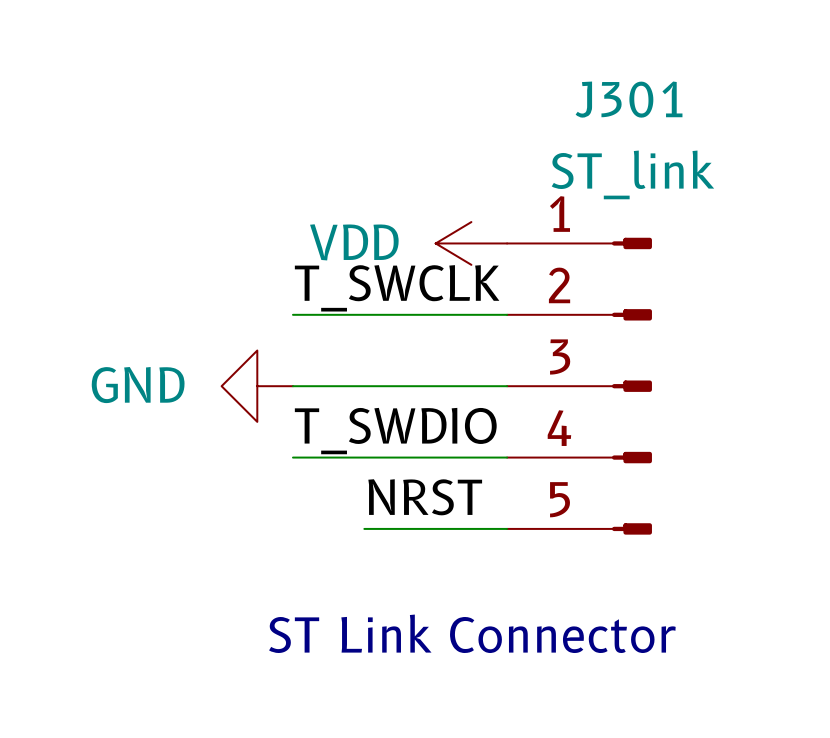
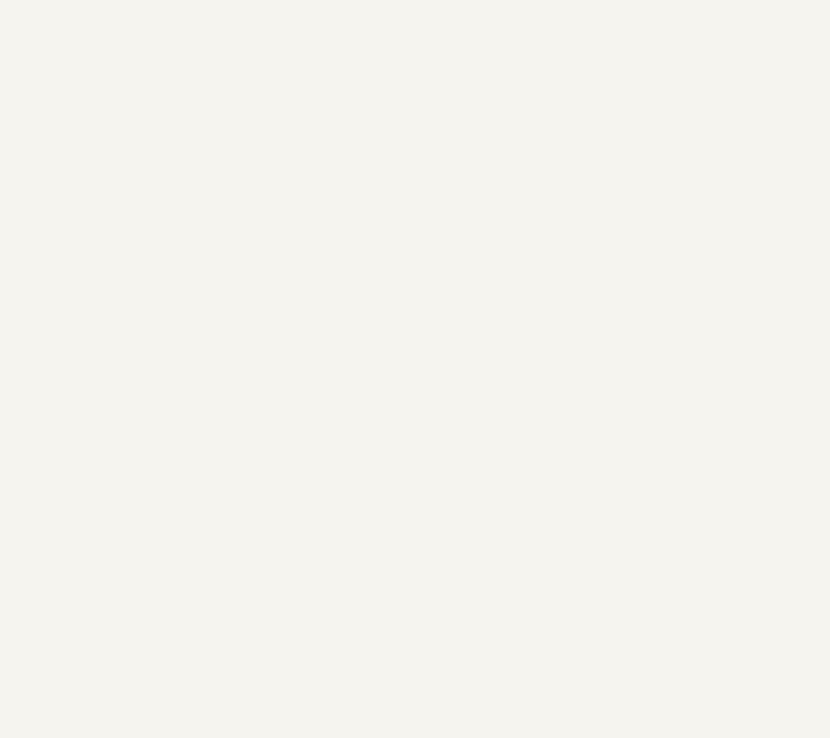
power symbol: VDD (471, 243) -> none
label: T_SWCLK (397, 288) -> none
wire: (292, 314) (507, 314) -> none
power symbol: GND (257, 386) -> none
wire: (292, 386) (507, 386) -> none
J301: ST_link (579, 386) -> none
label: T_SWDIO (395, 431) -> none
wire: (292, 457) (507, 457) -> none
label: NRST (425, 497) -> none
wire: (364, 528) (507, 528) -> none
text: ST Link Connector (472, 633) -> none

